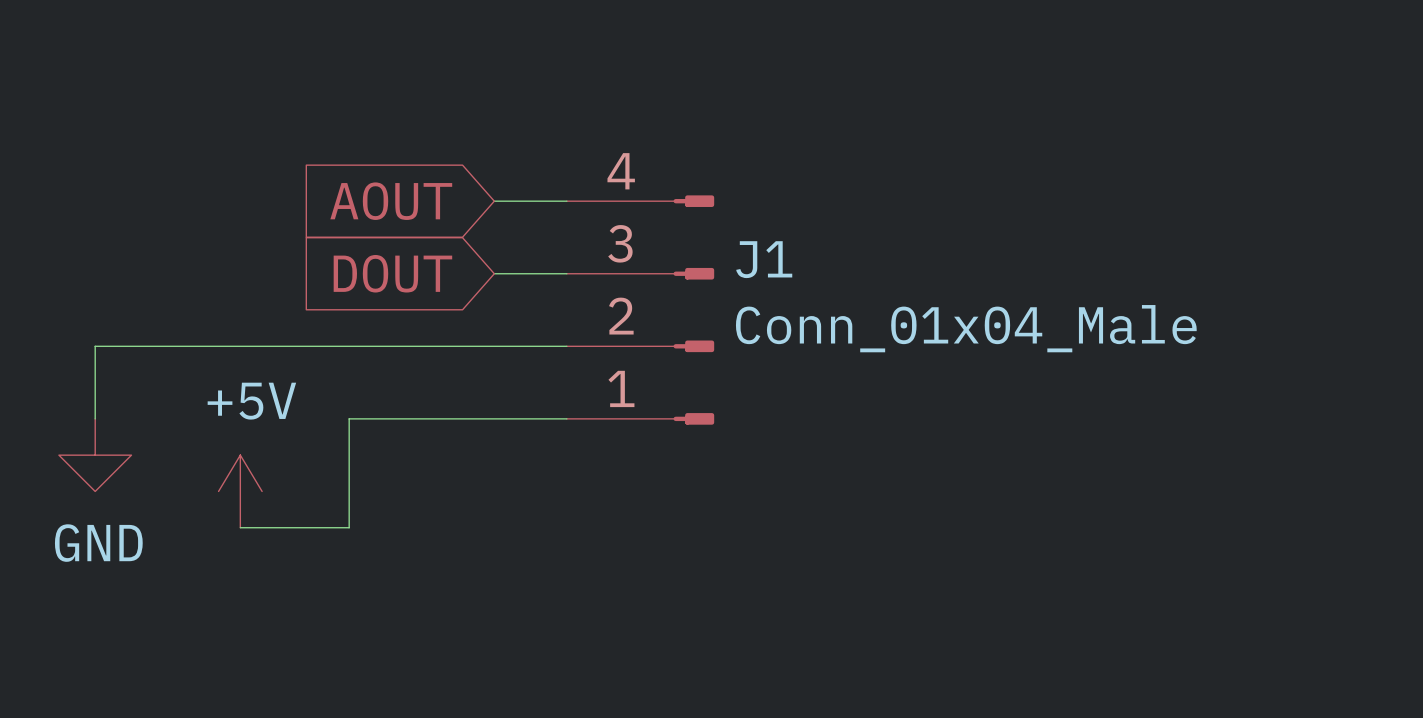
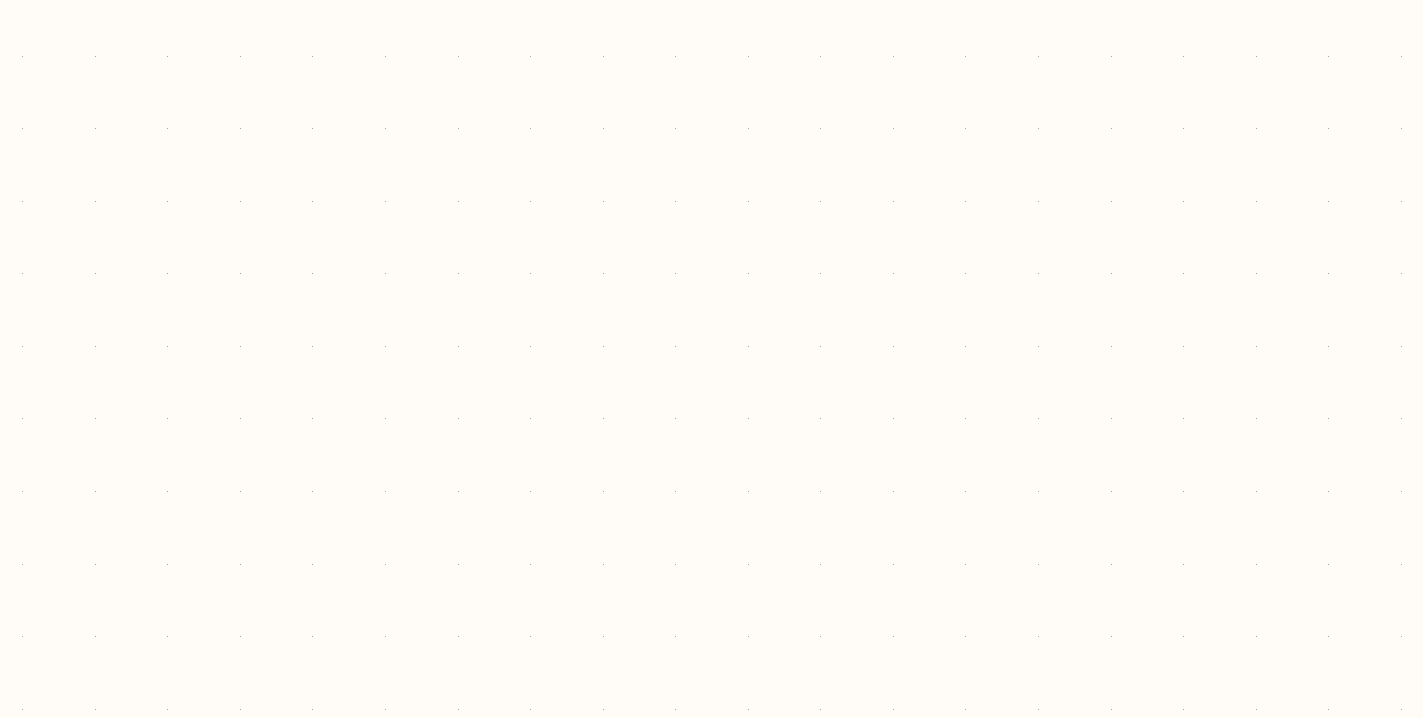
global label: AOUT (391, 201) -> none
wire: (494, 201) (566, 201) -> none
global label: DOUT (392, 273) -> none
wire: (494, 273) (566, 273) -> none
J1: Conn_01x04_Male (640, 310) -> none
wire: (566, 346) (95, 346) (95, 418) -> none
wire: (566, 418) (349, 418) (349, 527) (240, 527) -> none
power symbol: GND (95, 455) -> none
power symbol: +5V (240, 491) -> none

